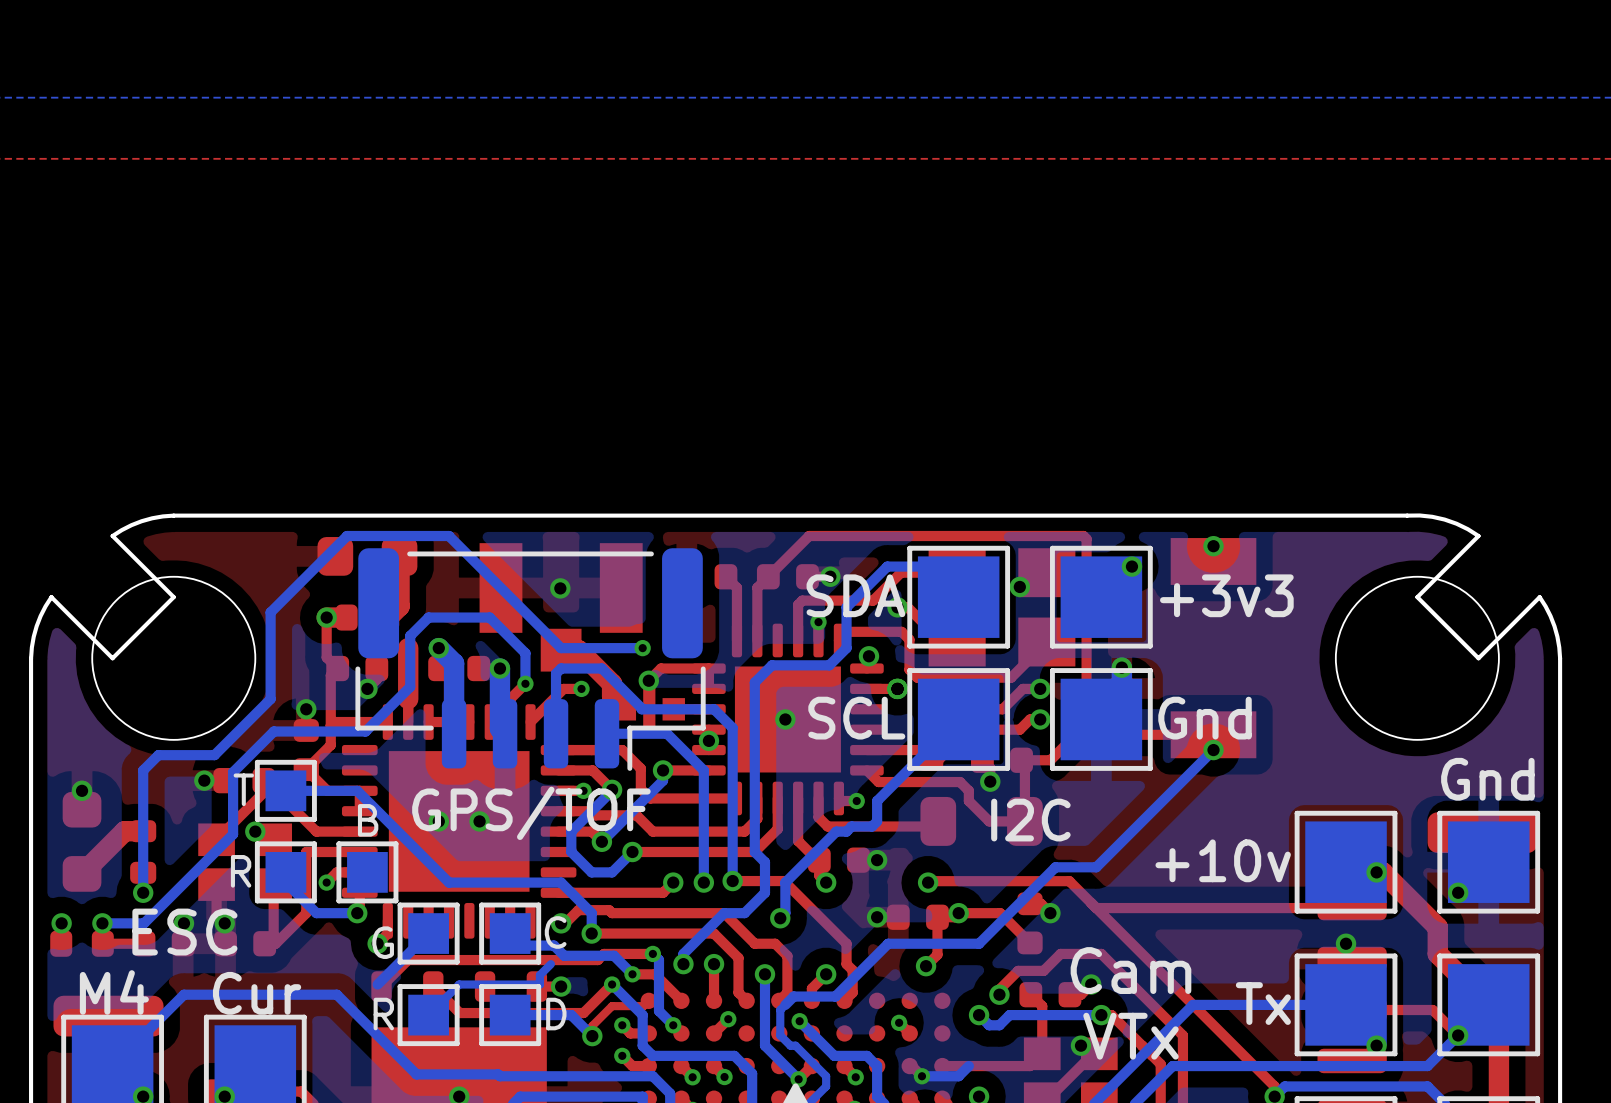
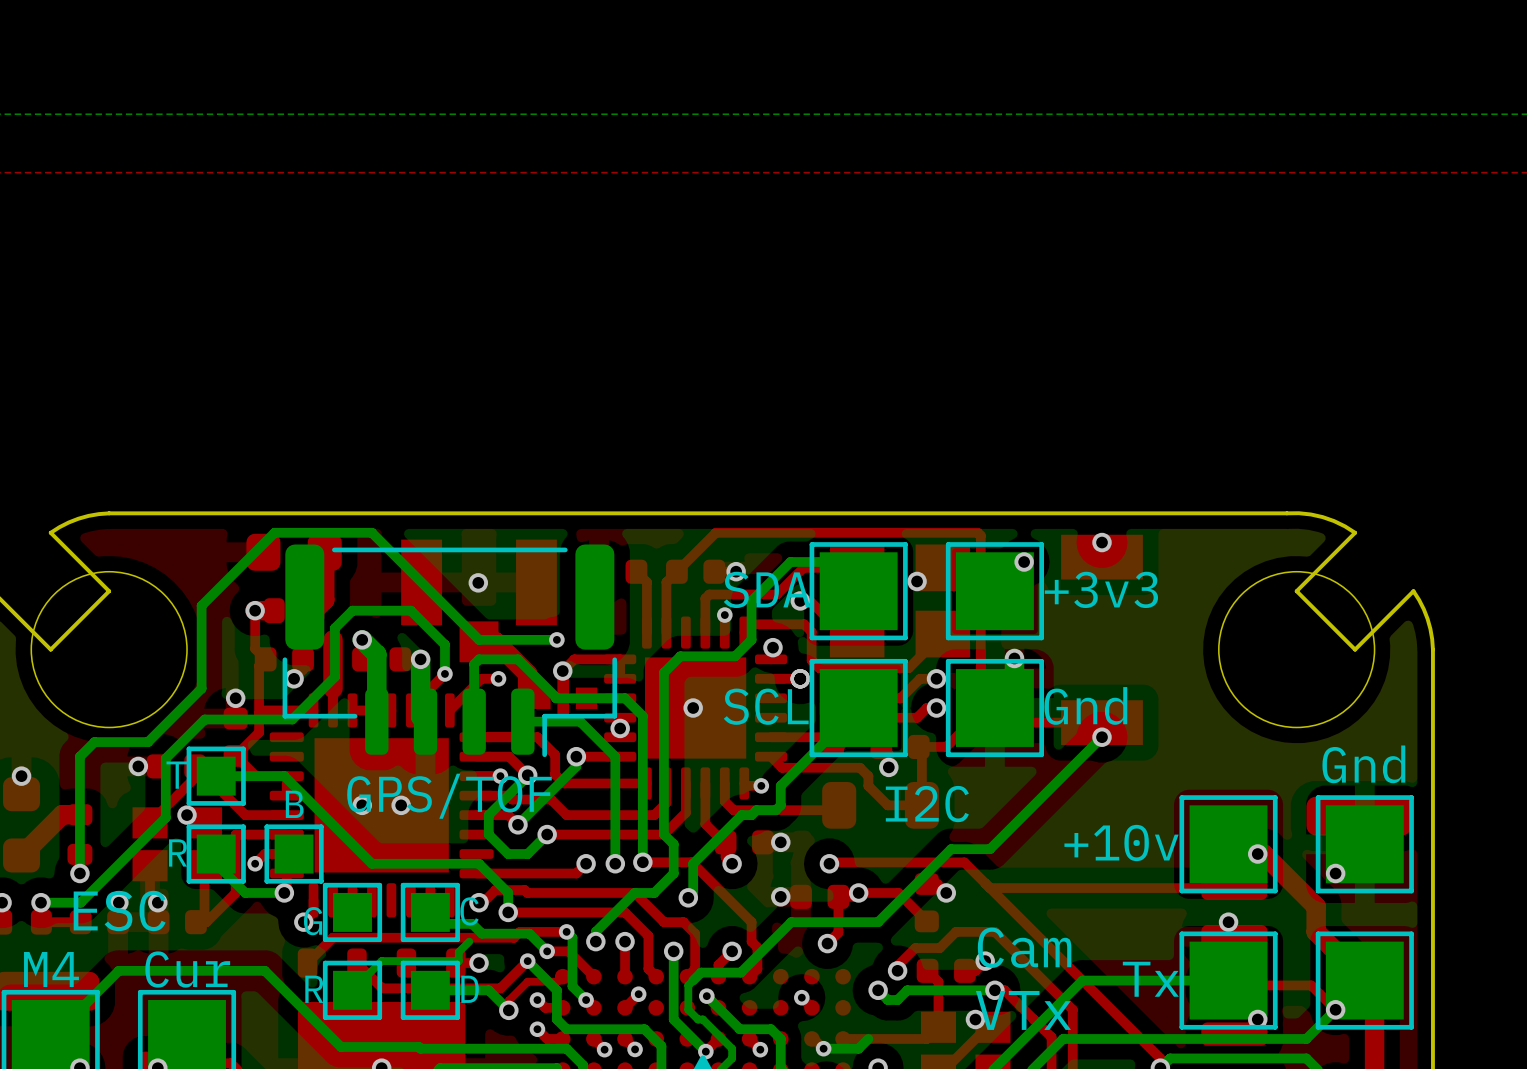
bottom track: (428, 933) (377, 984) -> none

